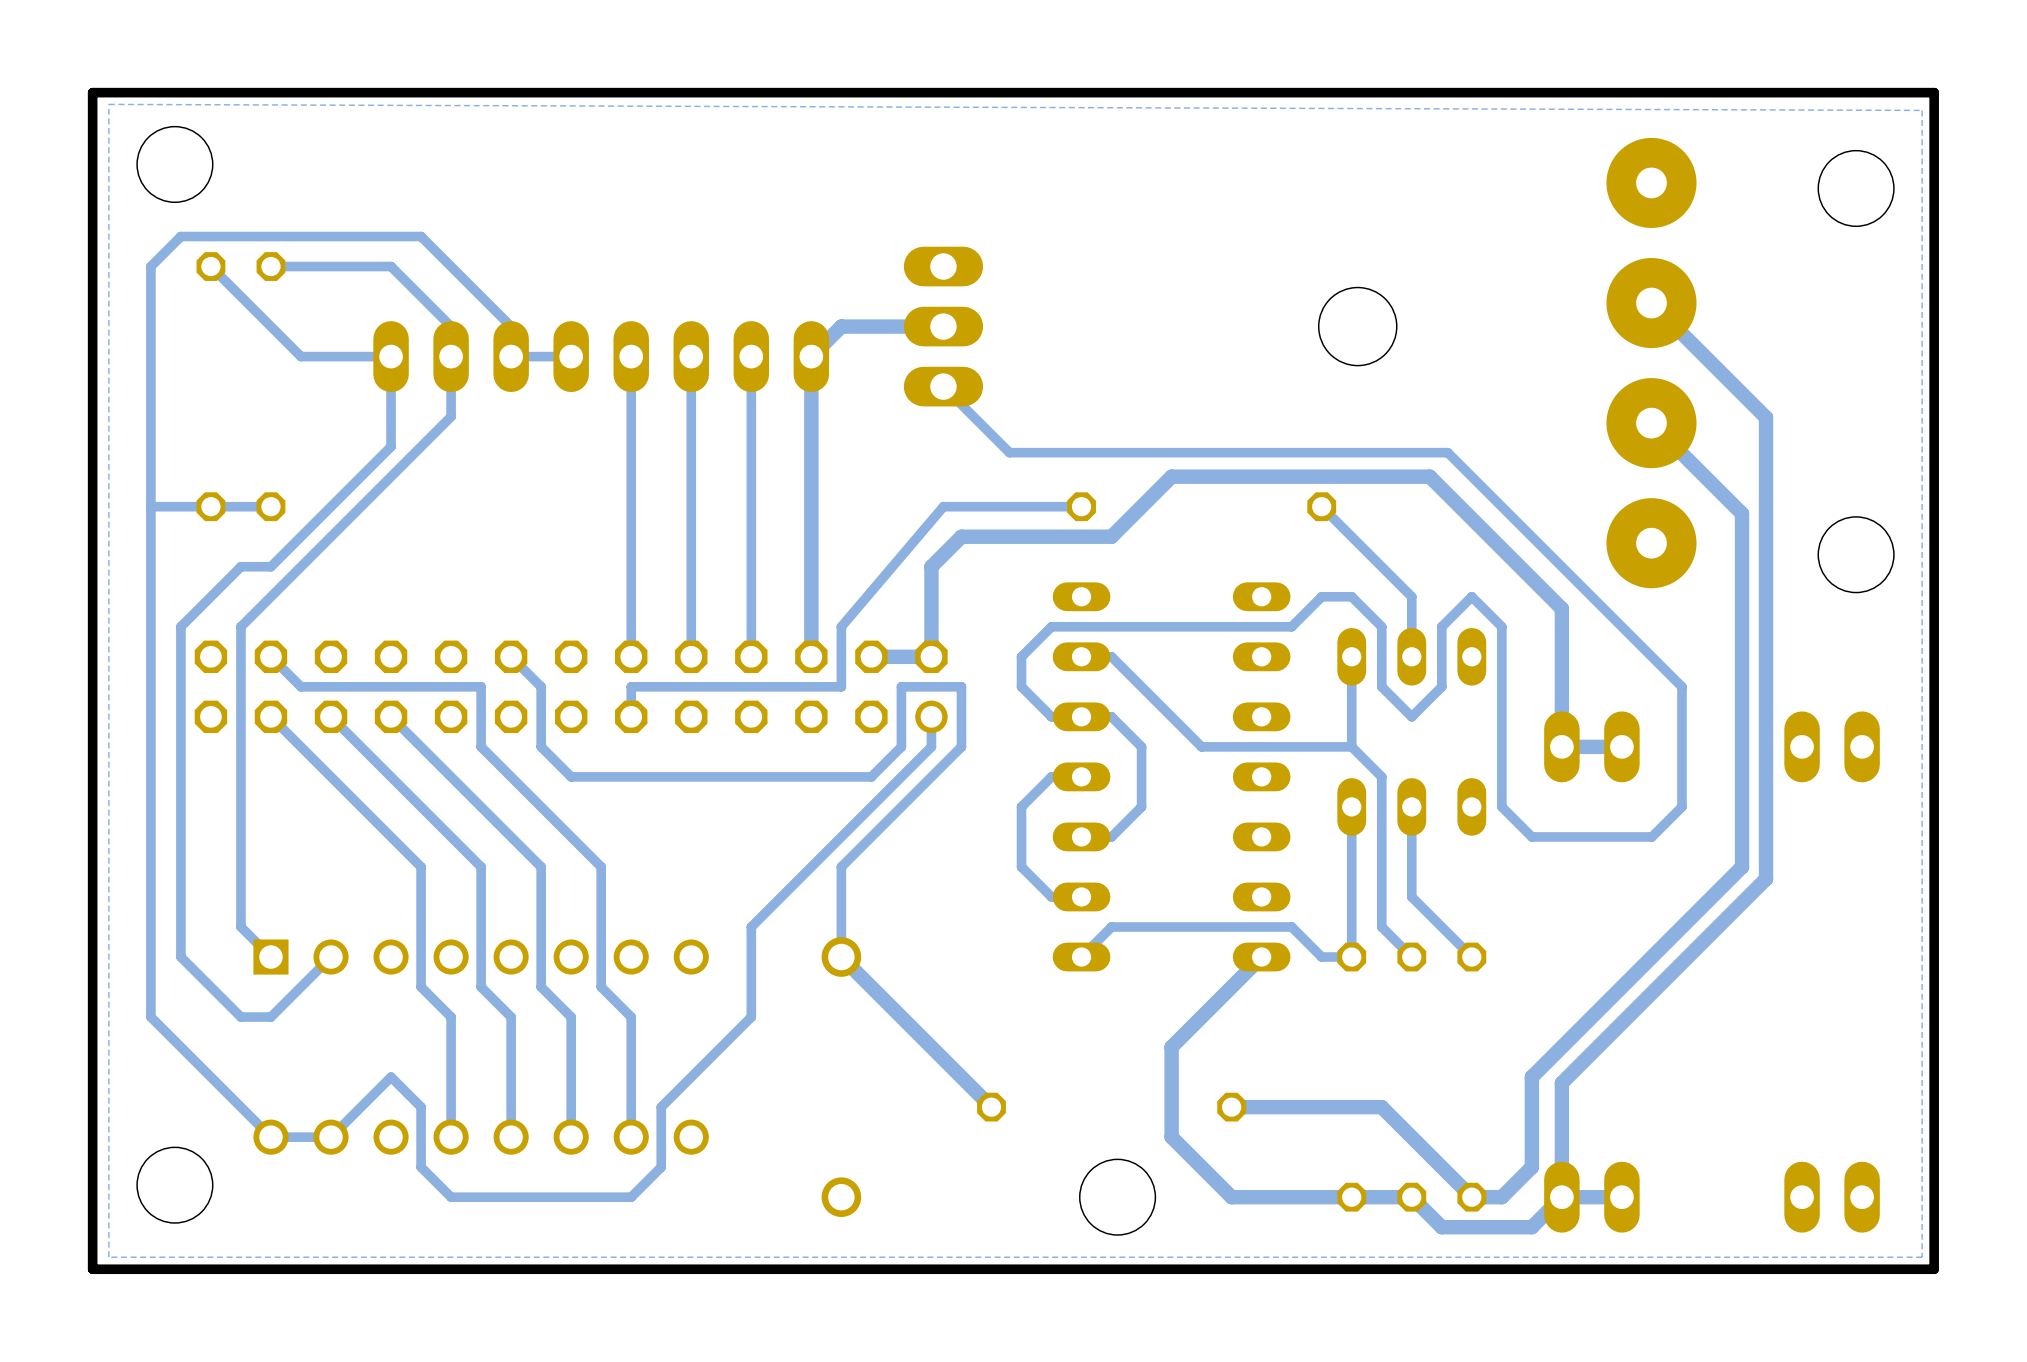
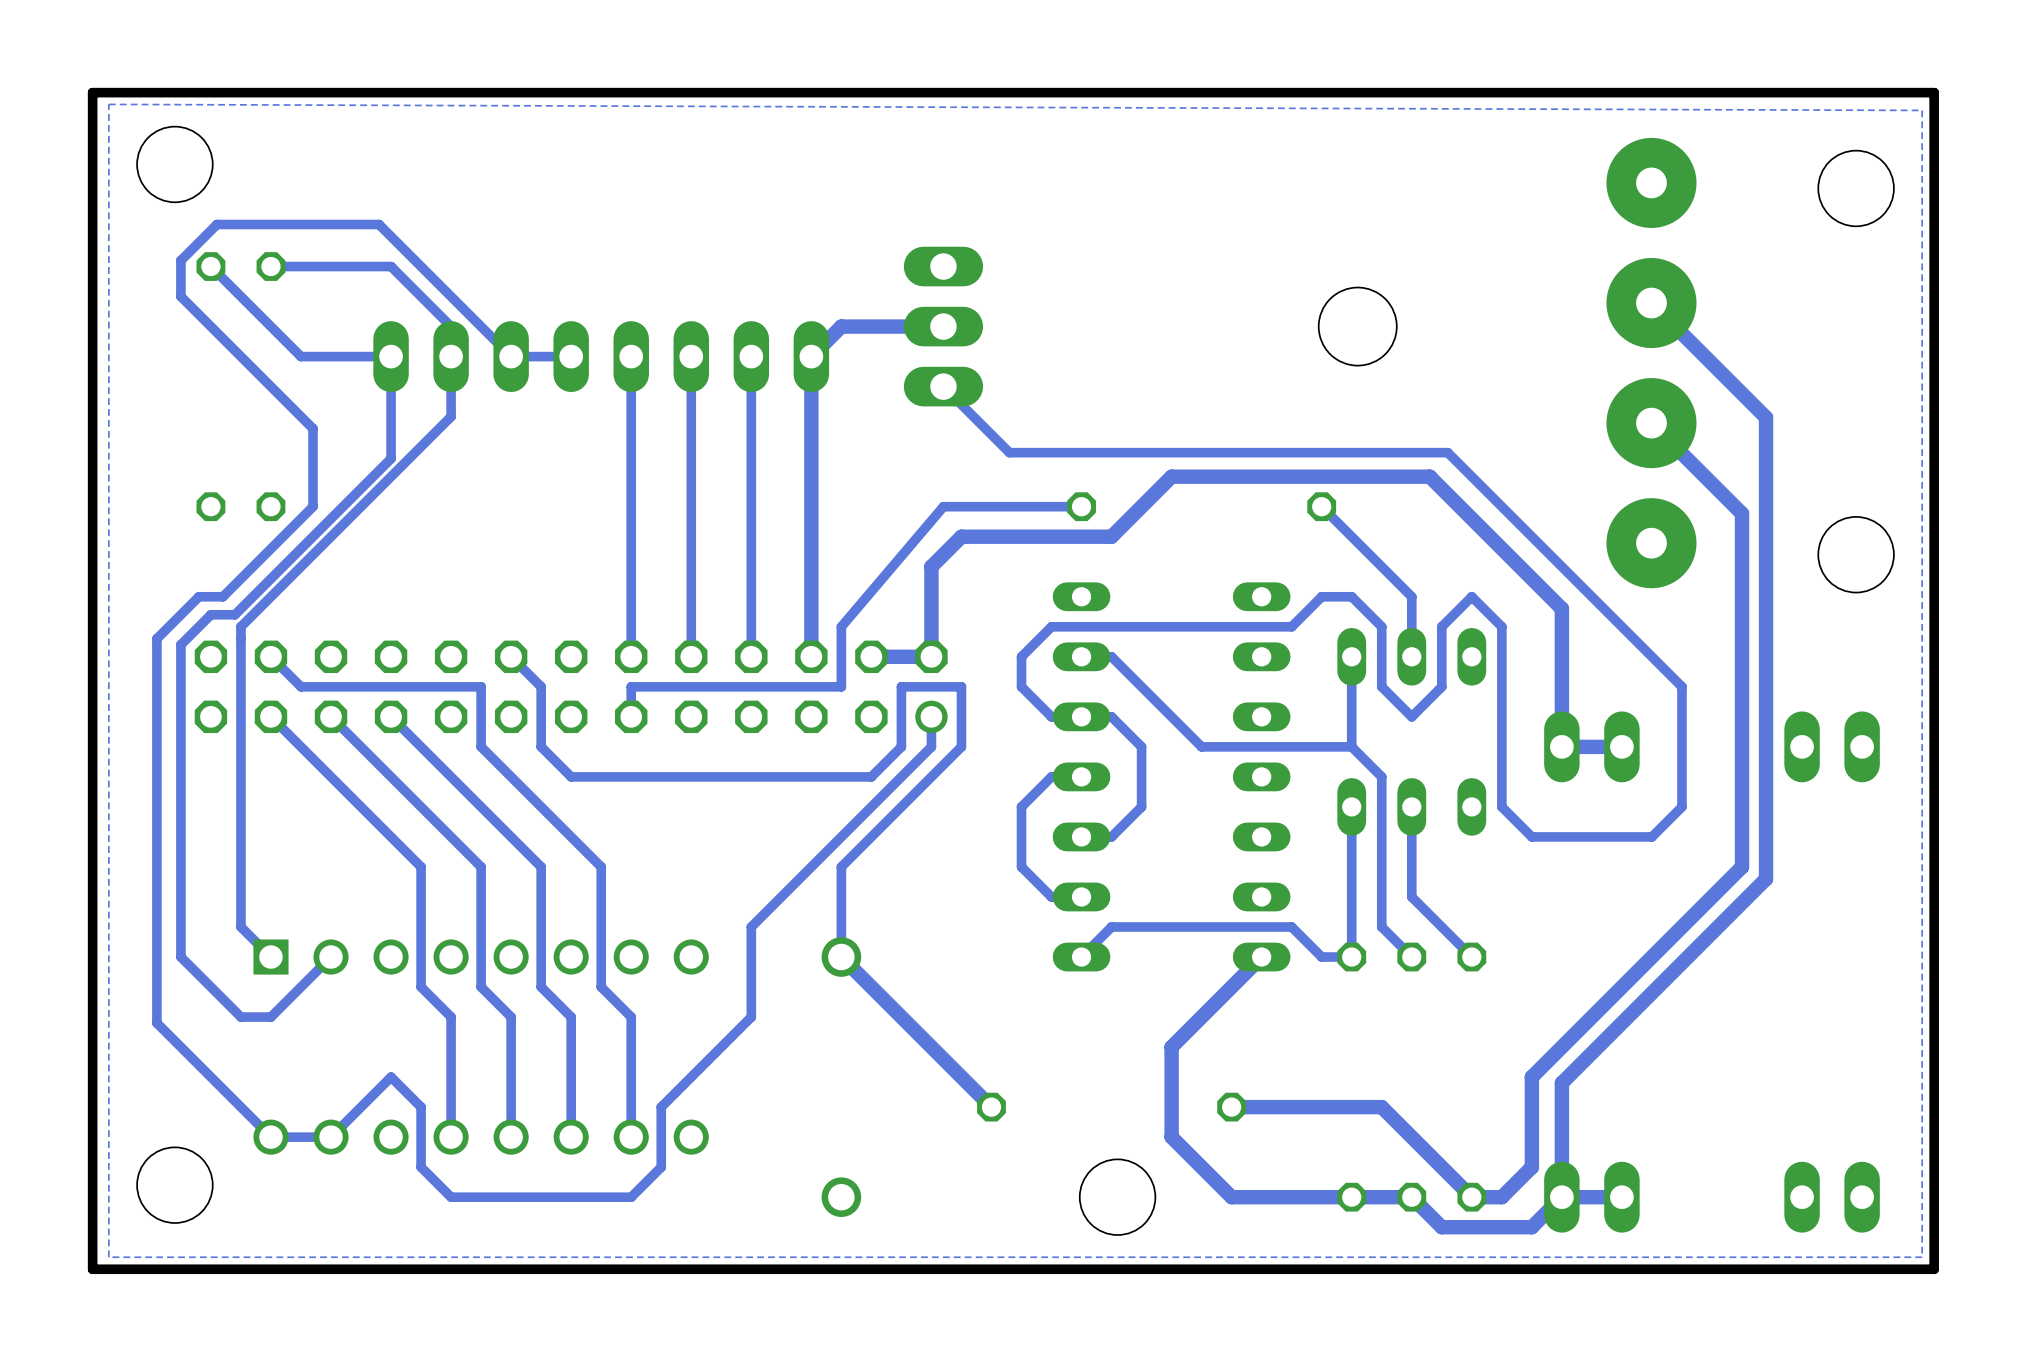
track: (511, 356) (511, 326) (421, 236) (180, 236) (150, 266) (150, 1017) (156, 1023) -> (511, 356) (379, 224) (216, 224) (180, 260) (180, 296) (313, 428) (313, 506) (222, 596) (198, 596) (156, 638) (156, 1023)
track: (391, 446) (270, 566) (240, 566) (180, 626) (180, 644) -> (391, 446) (391, 458) (234, 614) (210, 614) (180, 644)
track: (270, 506) (150, 506) -> none

